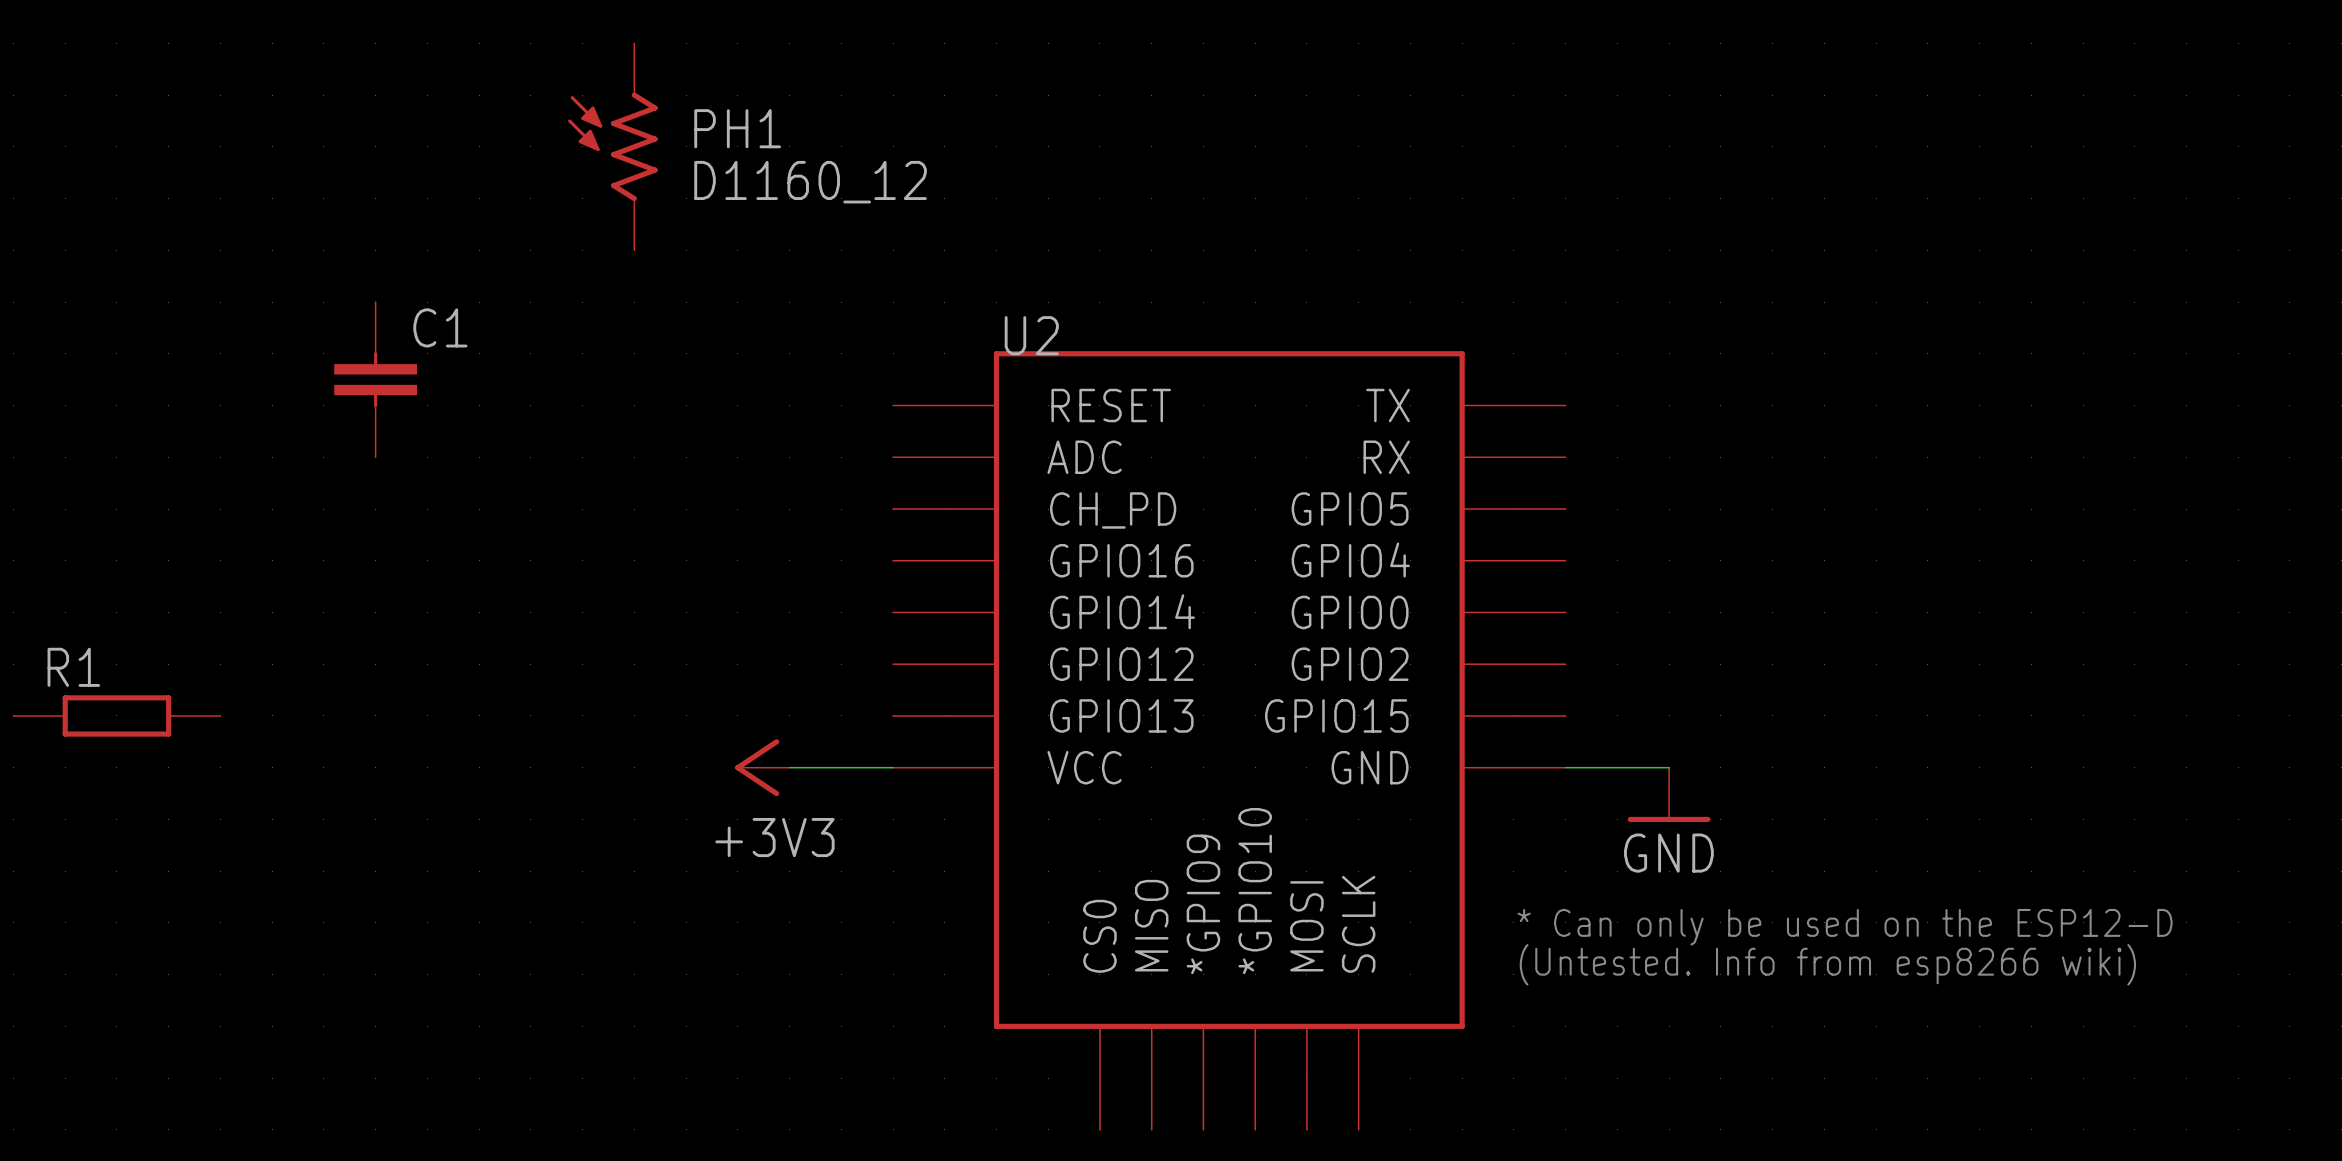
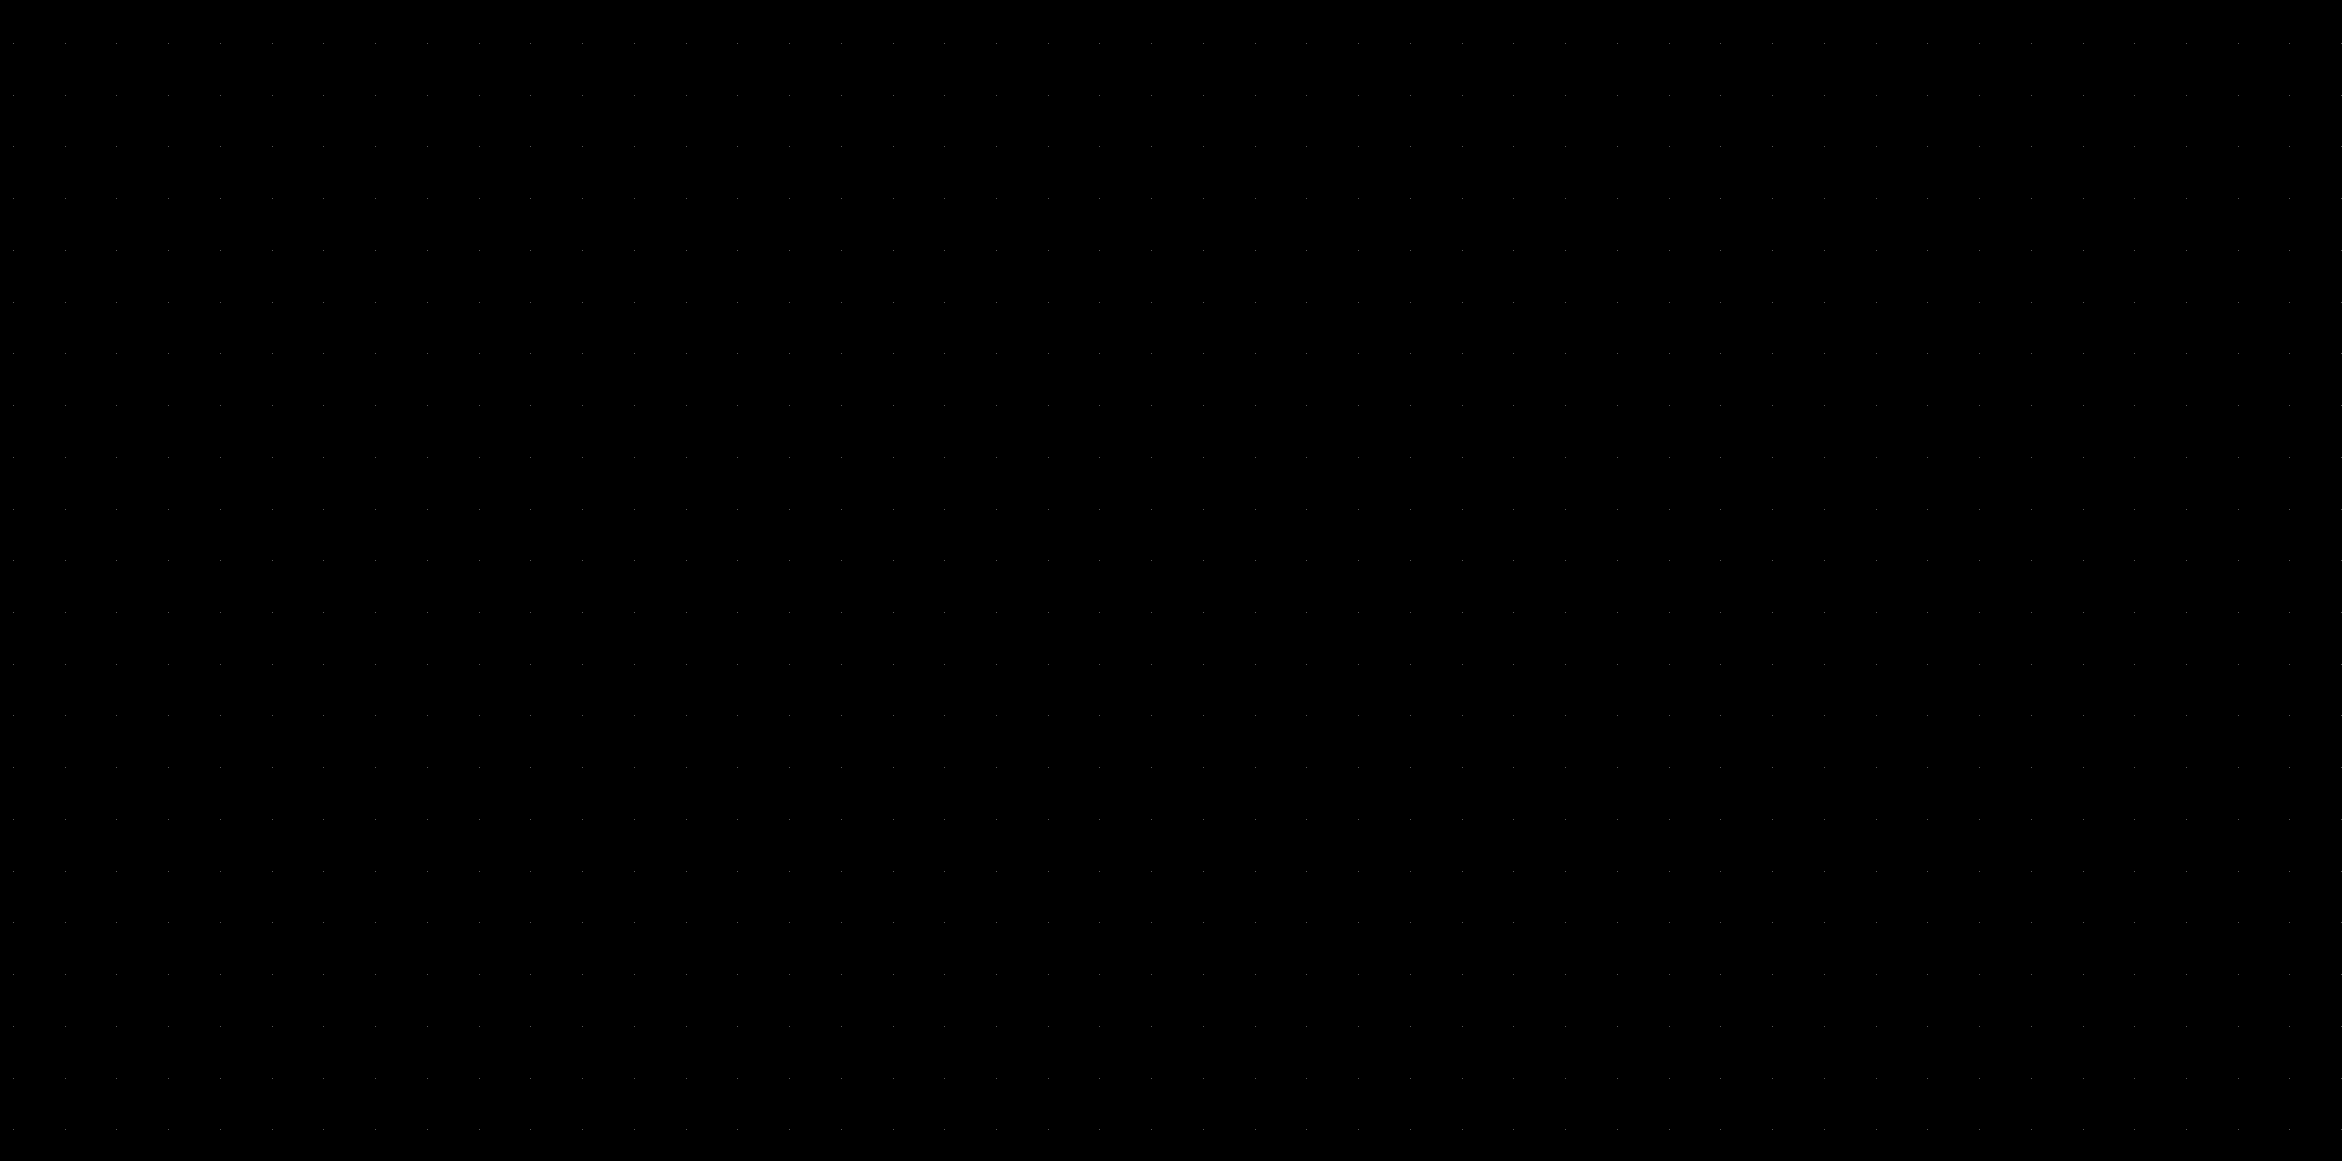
PH1: D1160_12 (612, 146) -> none
C1: (375, 379) -> none
R1: (116, 715) -> none
U2: (1229, 740) -> none
power symbol: +3V3 (762, 767) -> none
wire: (789, 767) (893, 767) -> none
wire: (1565, 767) (1669, 767) -> none
power symbol: GND (1669, 794) -> none

